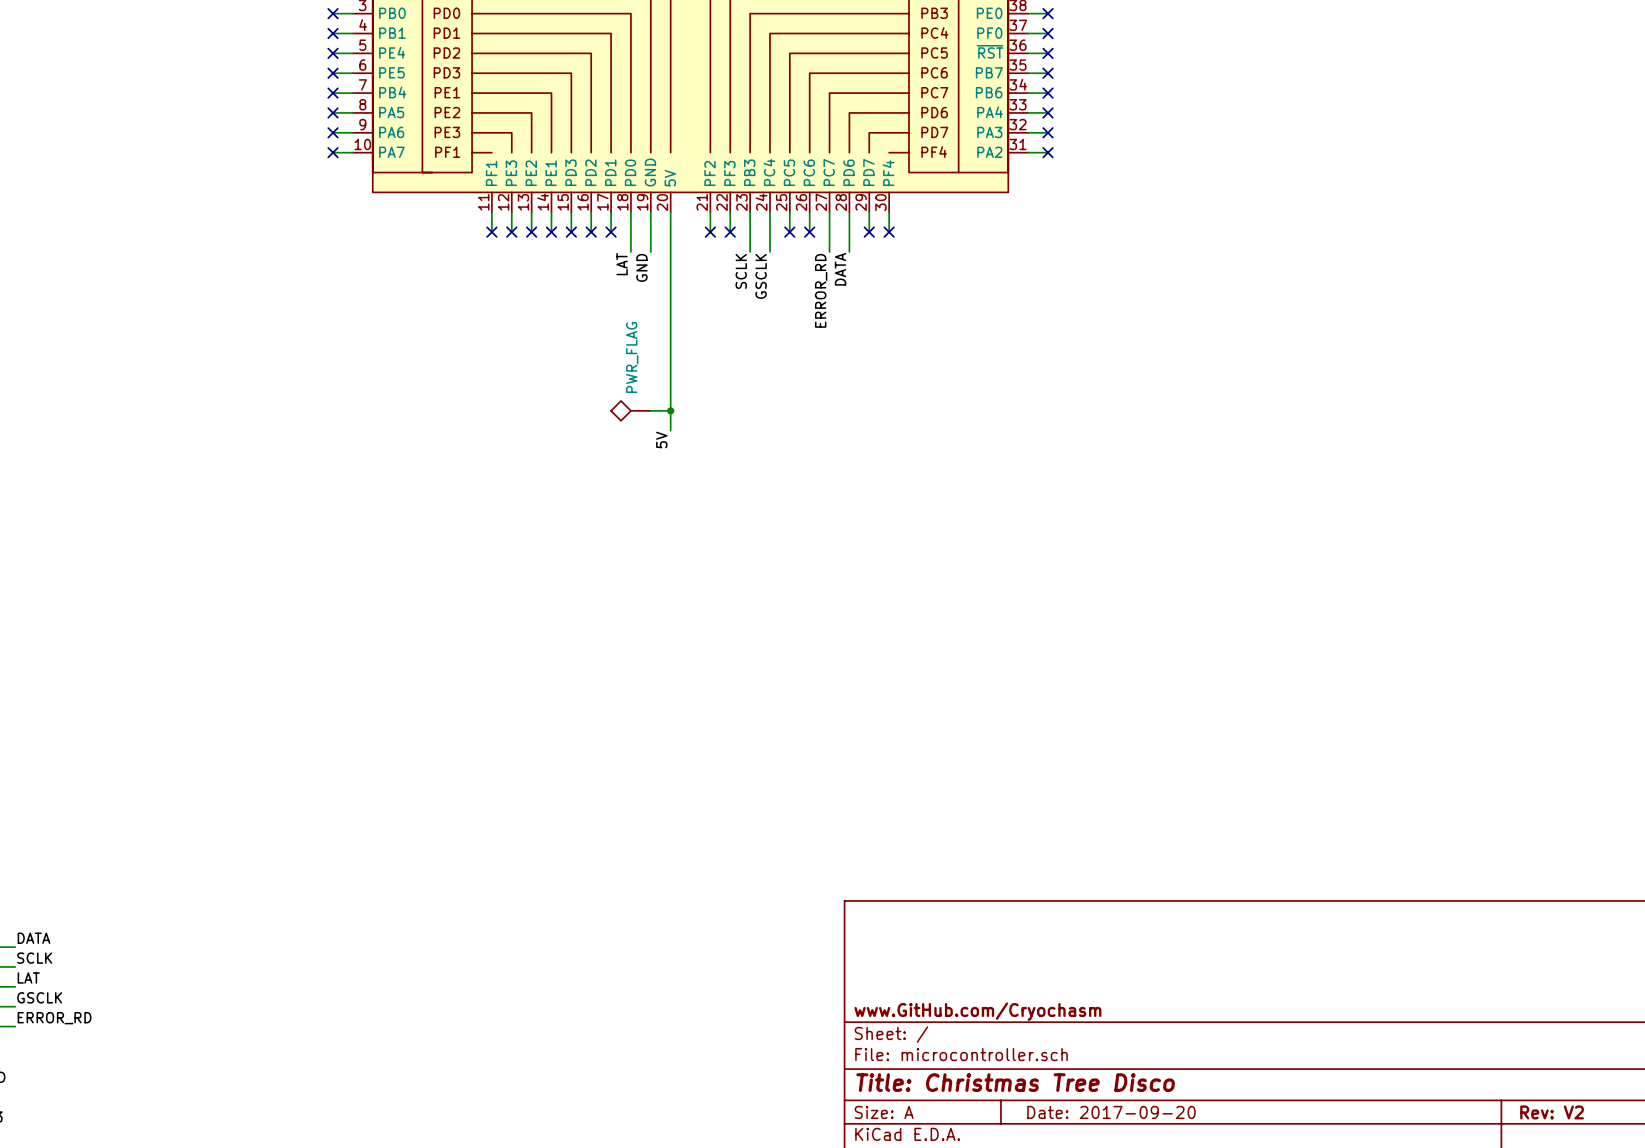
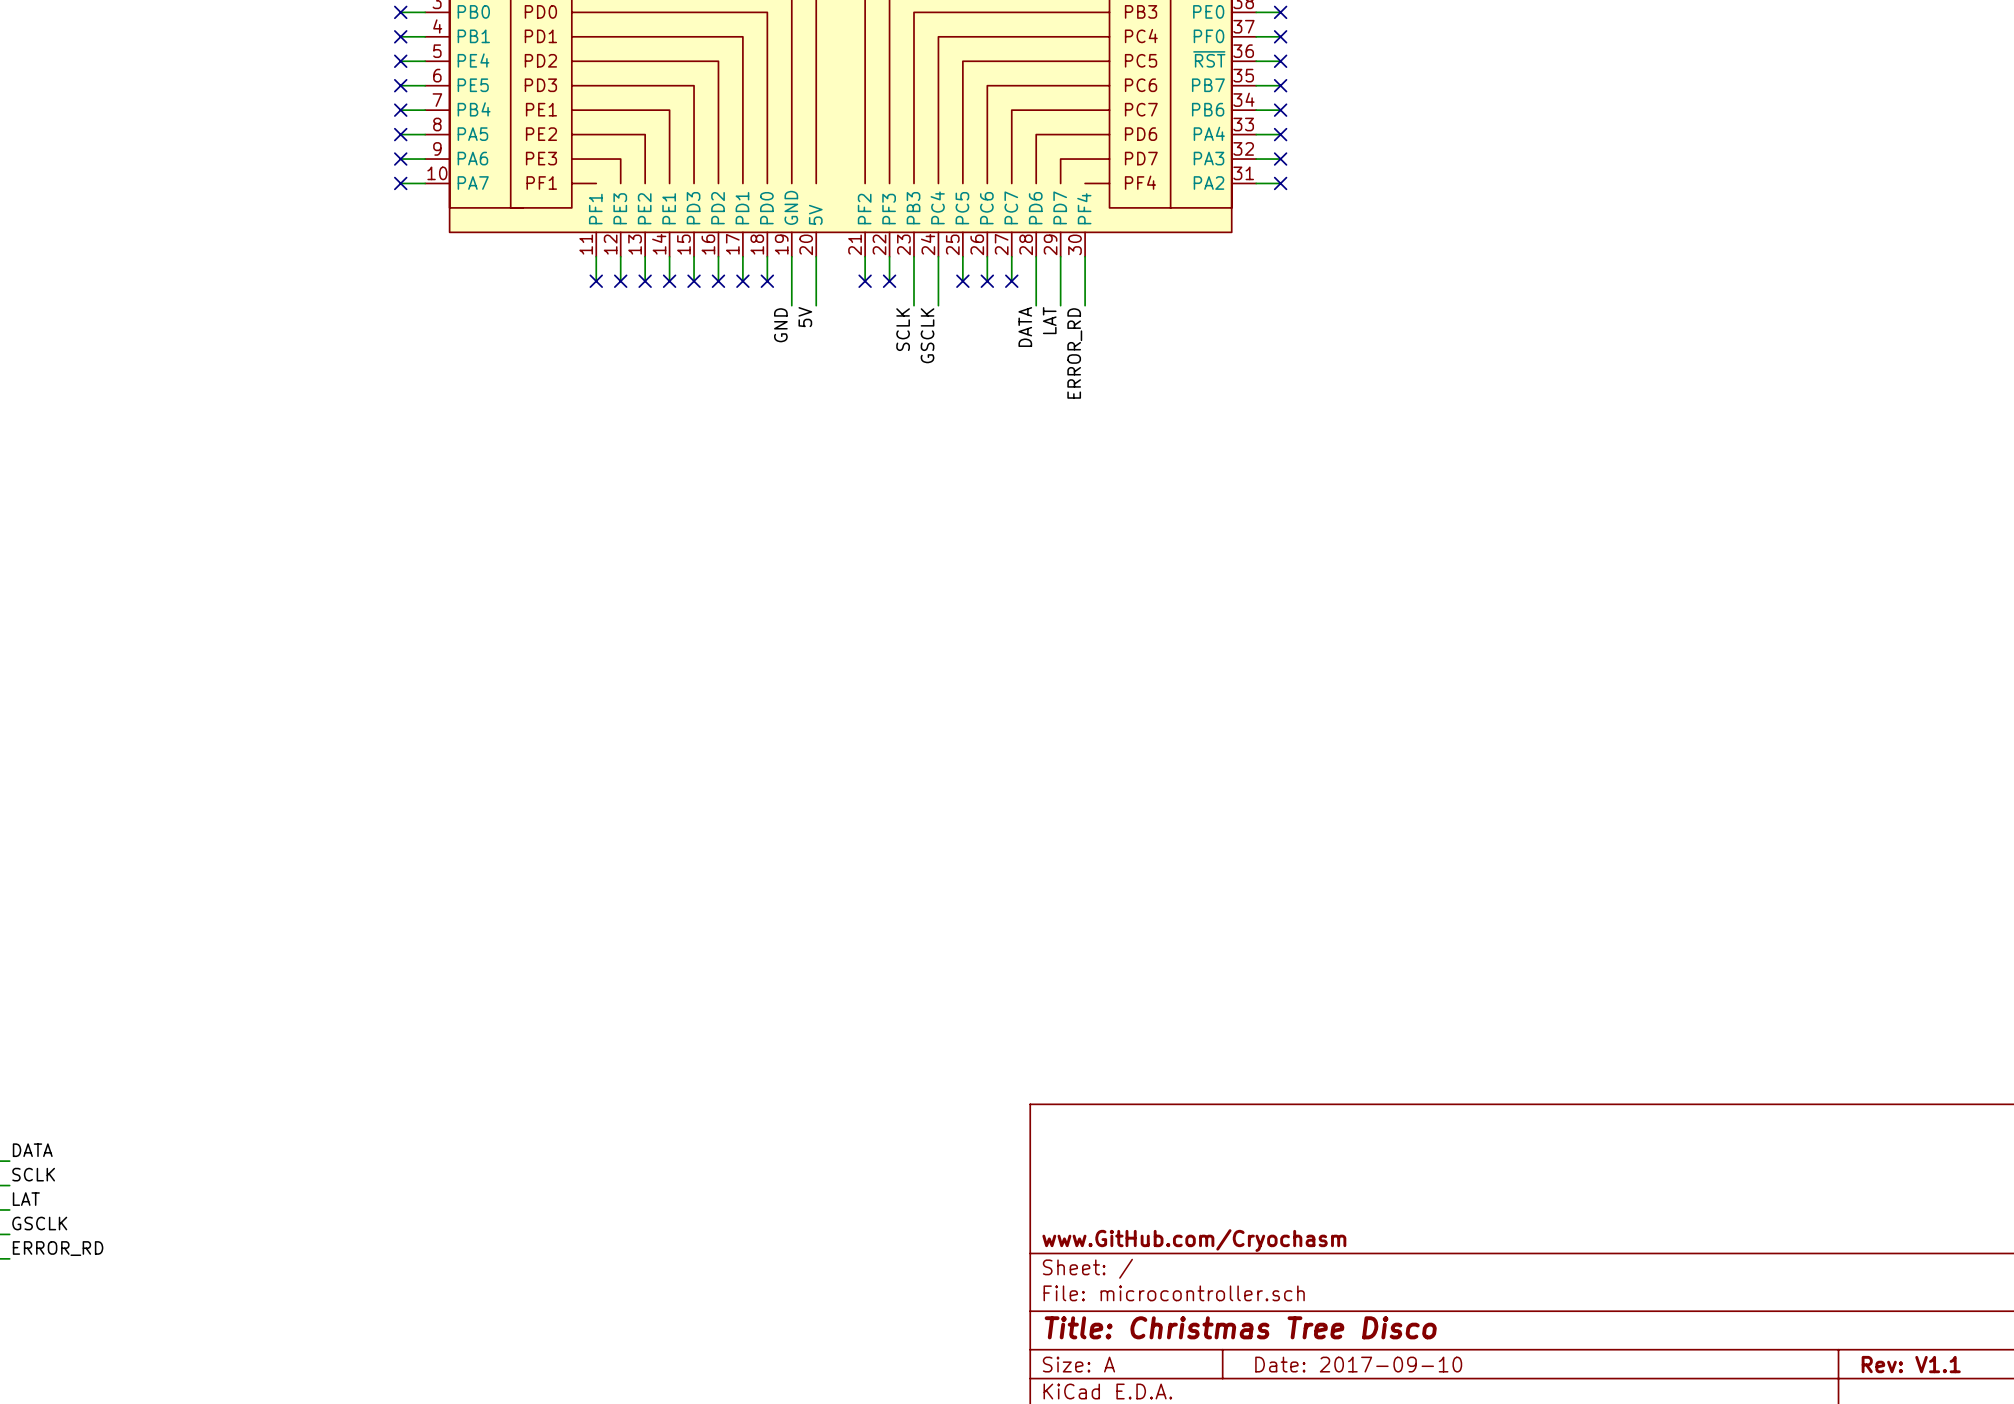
wire: (630, 232) (630, 251) -> none
no-connect mark: none -> (767, 281)
wire: (829, 232) (829, 251) -> (1060, 281) (1060, 305)
no-connect mark: none -> (1011, 281)
no-connect mark: (869, 232) -> none
wire: none -> (1085, 281) (1085, 305)
no-connect mark: (889, 232) -> none
wire: (670, 251) (670, 430) -> none
label: LAT (622, 264) -> none
label: none -> LAT (1049, 320)
label position: ERROR_RD (821, 290) -> ERROR_RD (1074, 353)
power symbol: PWR_FLAG (630, 410) -> none
wire: (650, 410) (670, 410) -> none
junction: (670, 410) -> none
label position: 5V (661, 440) -> 5V (805, 317)
title block: Date: 2017-09-20 (1111, 1112) -> Date: 2017-09-10 (1358, 1364)
title block: Rev: V2 (1552, 1112) -> Rev: V1.1 (1911, 1364)

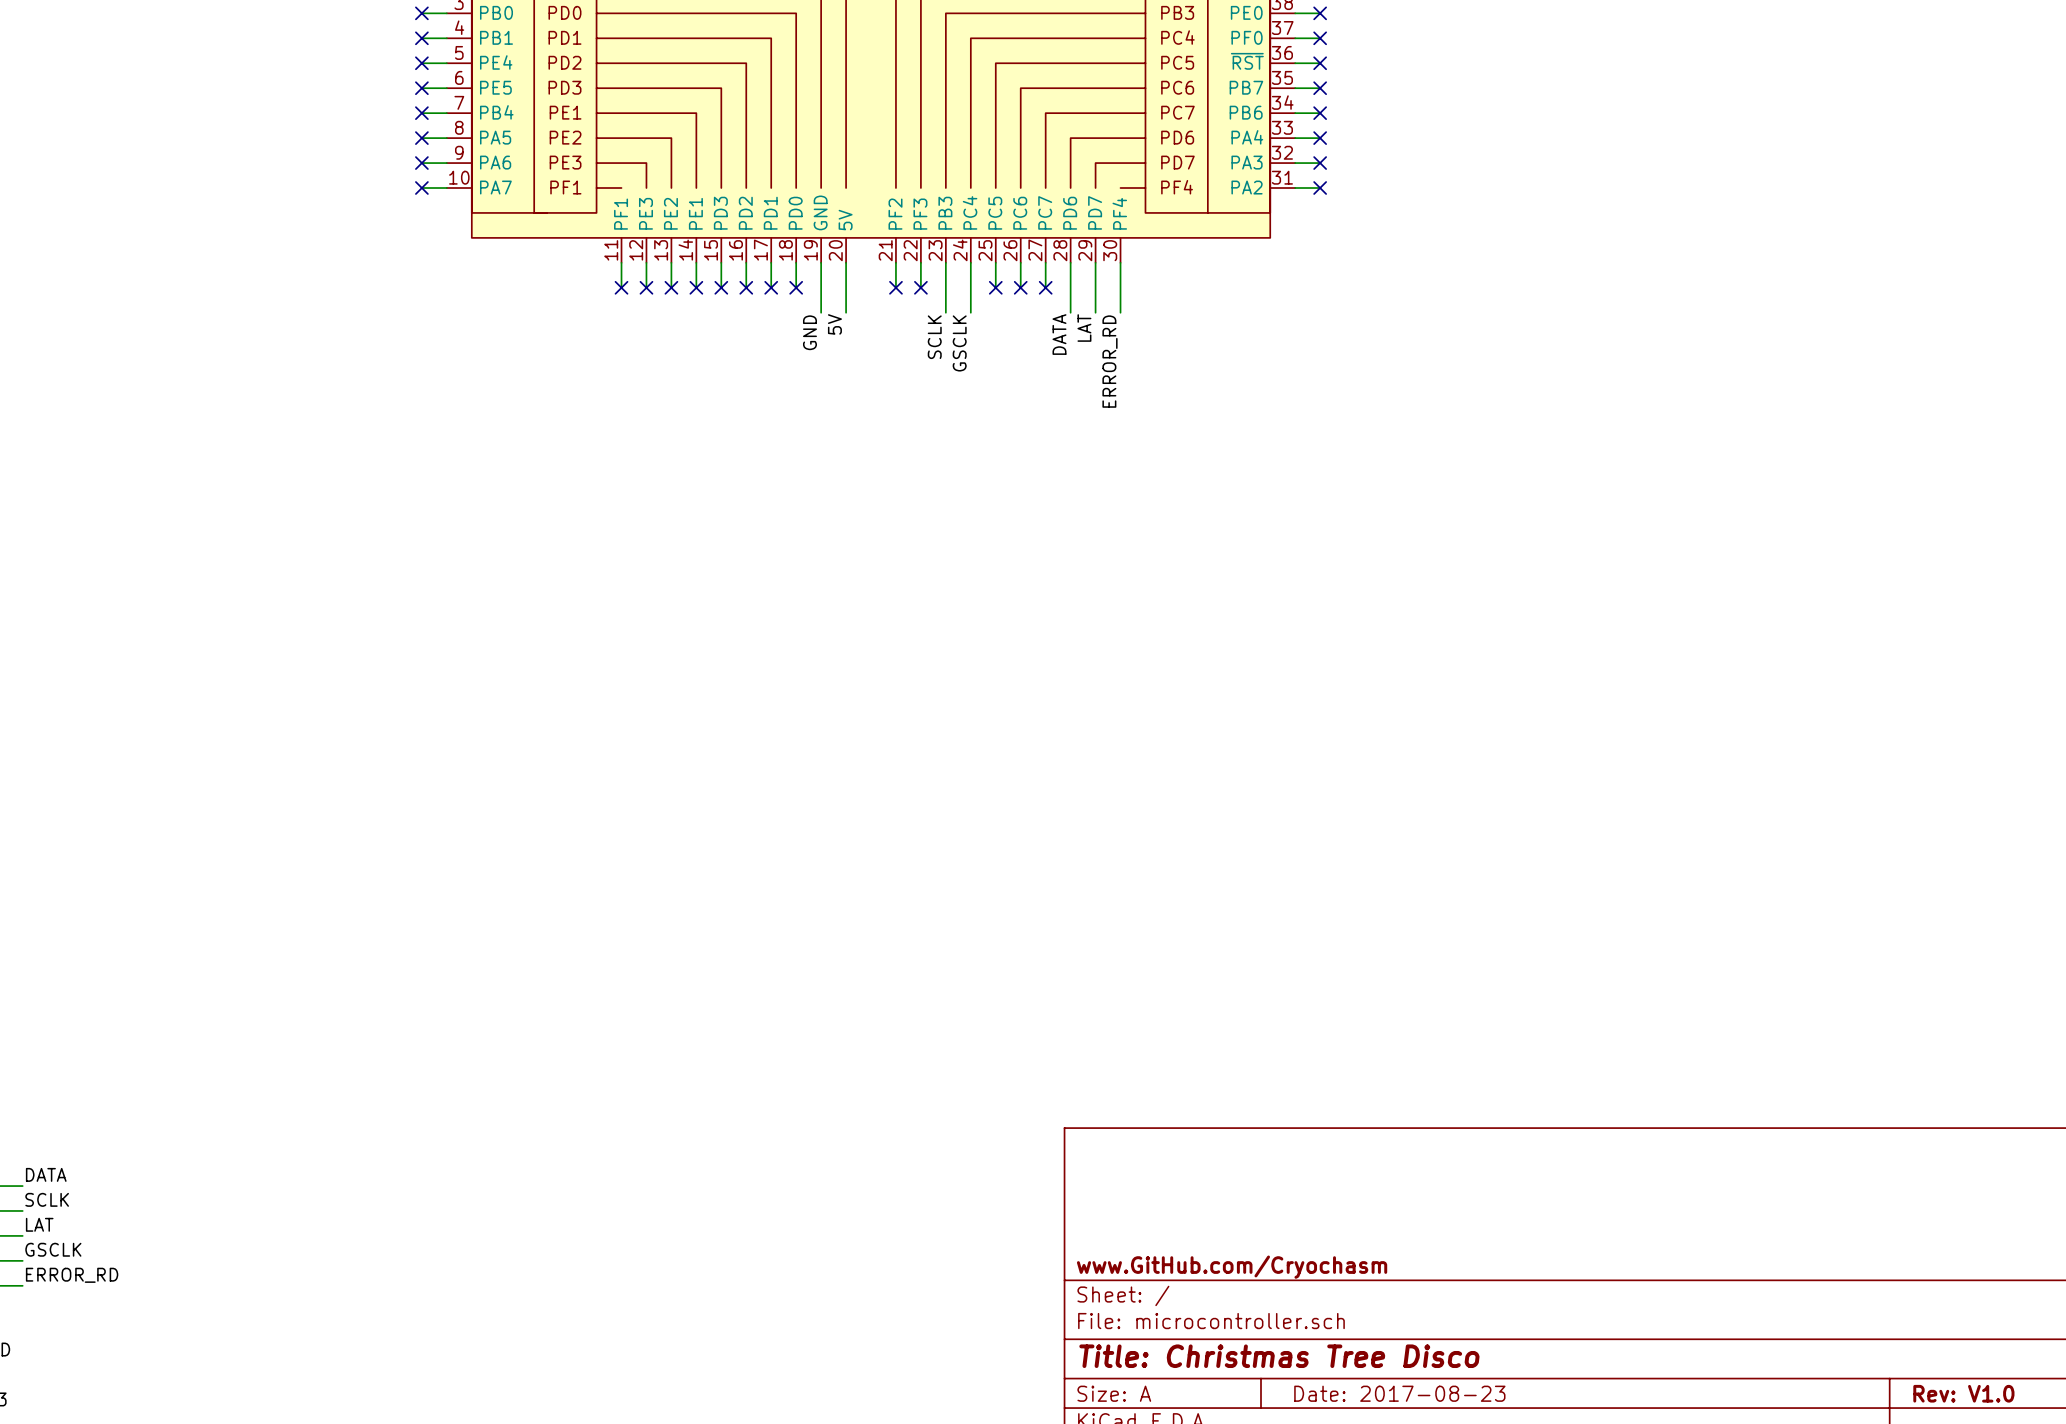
title block: Date: 2017-09-10 (1358, 1364) -> Date: 2017-08-23 (1399, 1393)
title block: Rev: V1.1 (1911, 1364) -> Rev: V1.0 (1963, 1393)

